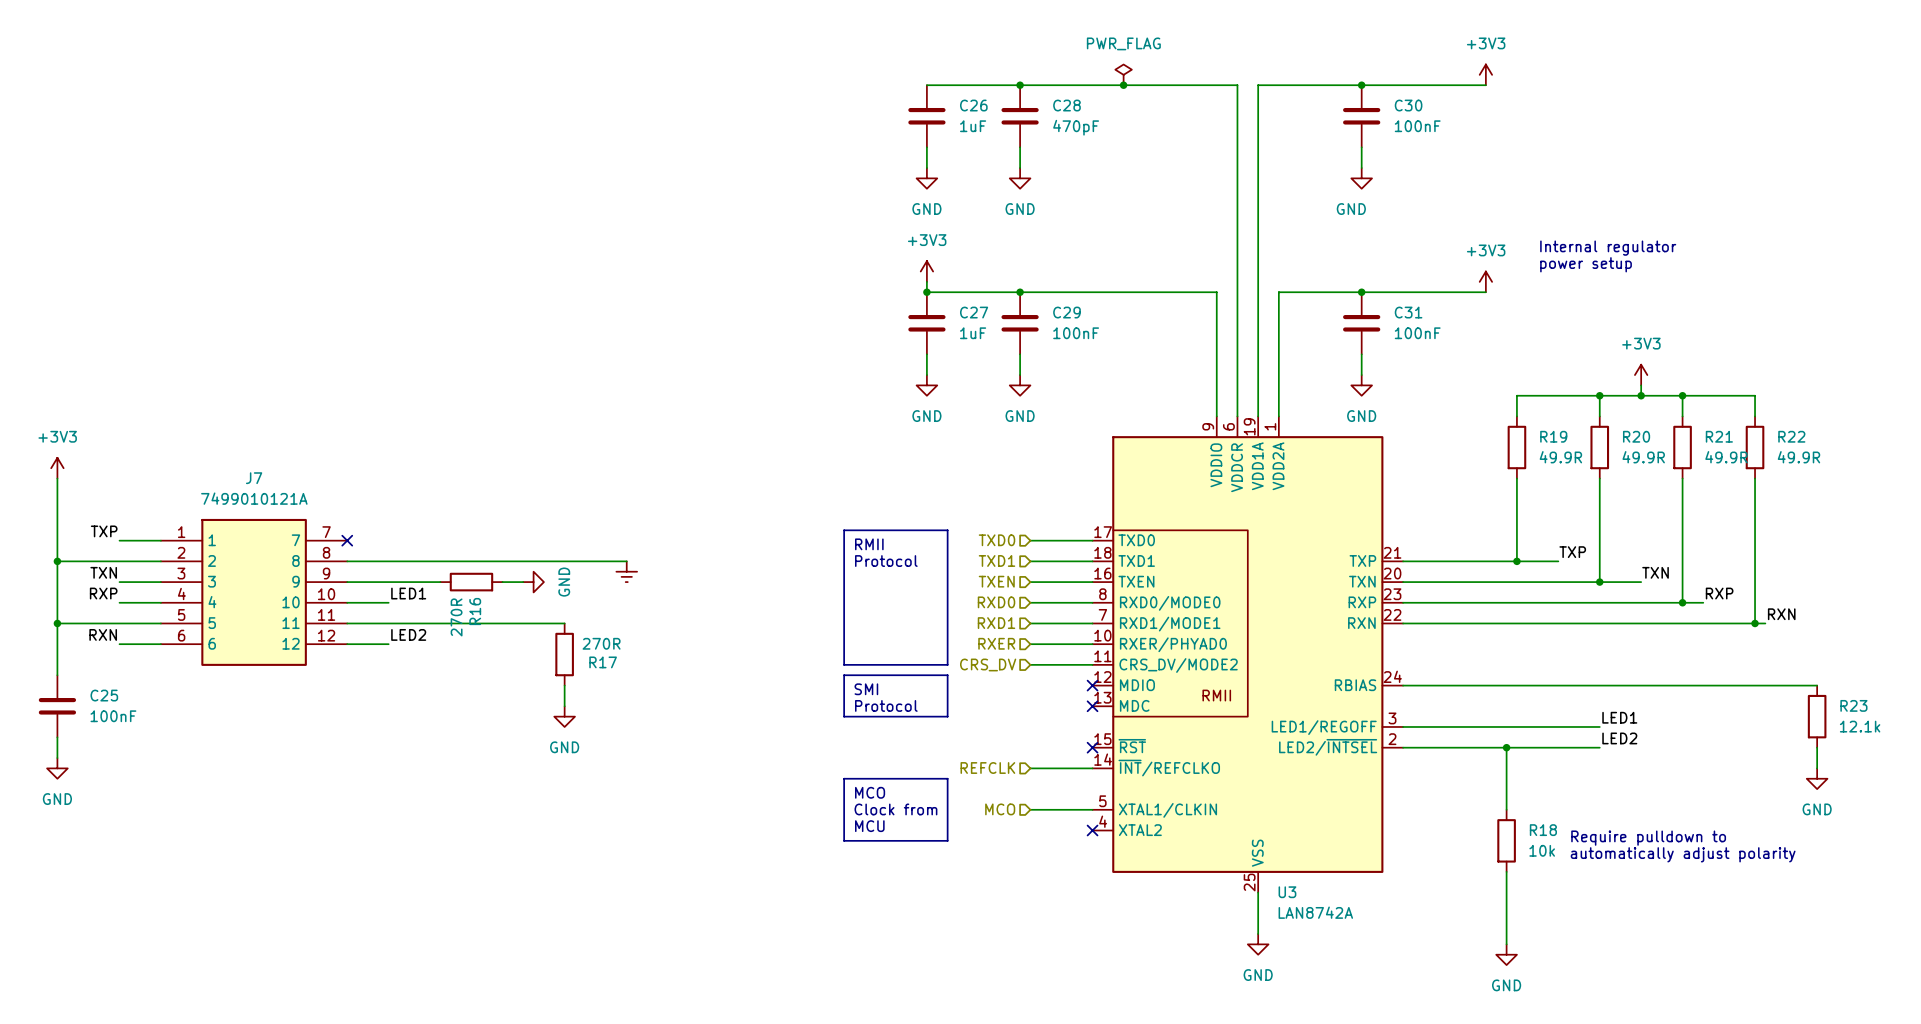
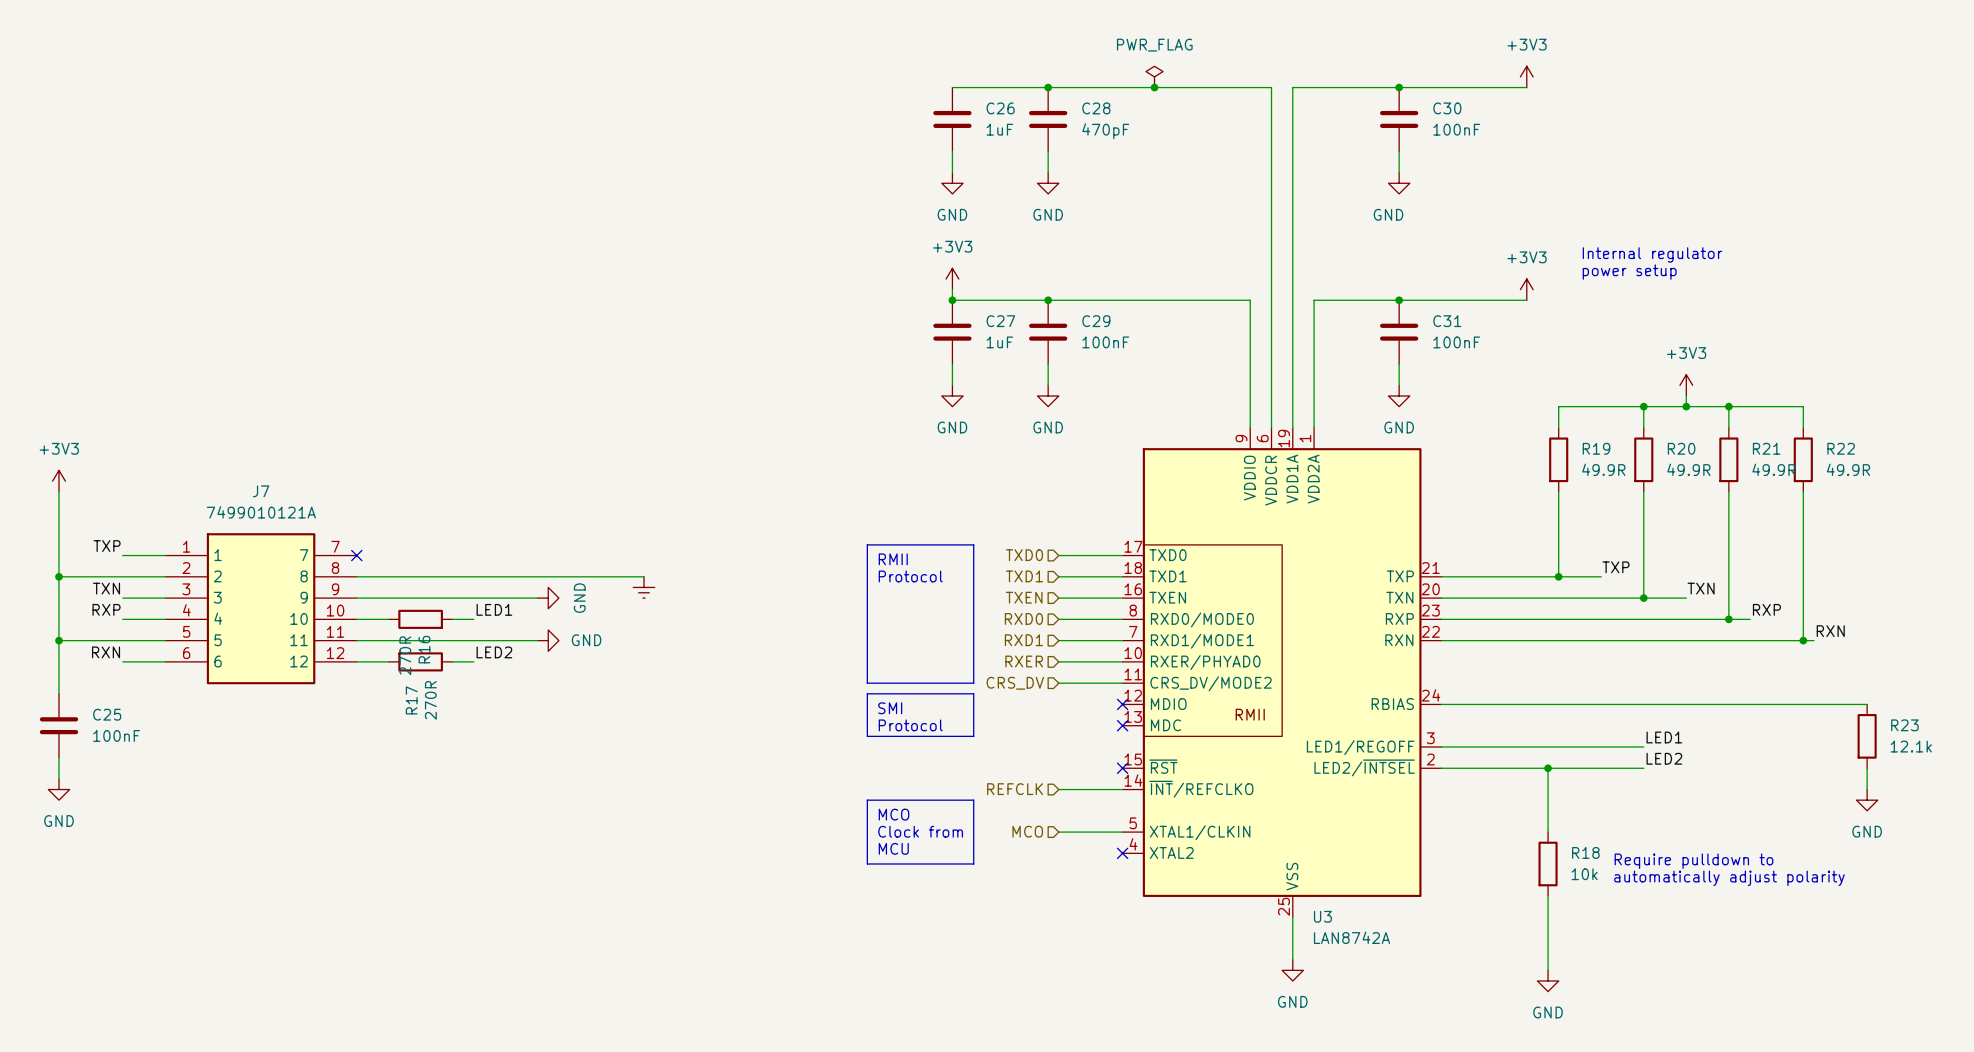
wire: none -> (452, 598) (516, 598)
R16 position: (471, 582) -> (420, 619)
label position: LED1 (408, 593) -> LED1 (494, 609)
wire: none -> (452, 619) (473, 619)
wire: (523, 623) (564, 623) -> none
label position: LED2 (408, 634) -> LED2 (494, 652)
wire: none -> (452, 661) (473, 661)
R17 rotation: 0° (564, 654) -> 90° clockwise (420, 661)
R17 position: (564, 654) -> (420, 661)
wire: (564, 685) (564, 706) -> none
power symbol rotation: 0° (564, 716) -> 90° counterclockwise (548, 640)
power symbol position: GND (564, 716) -> GND (548, 640)

